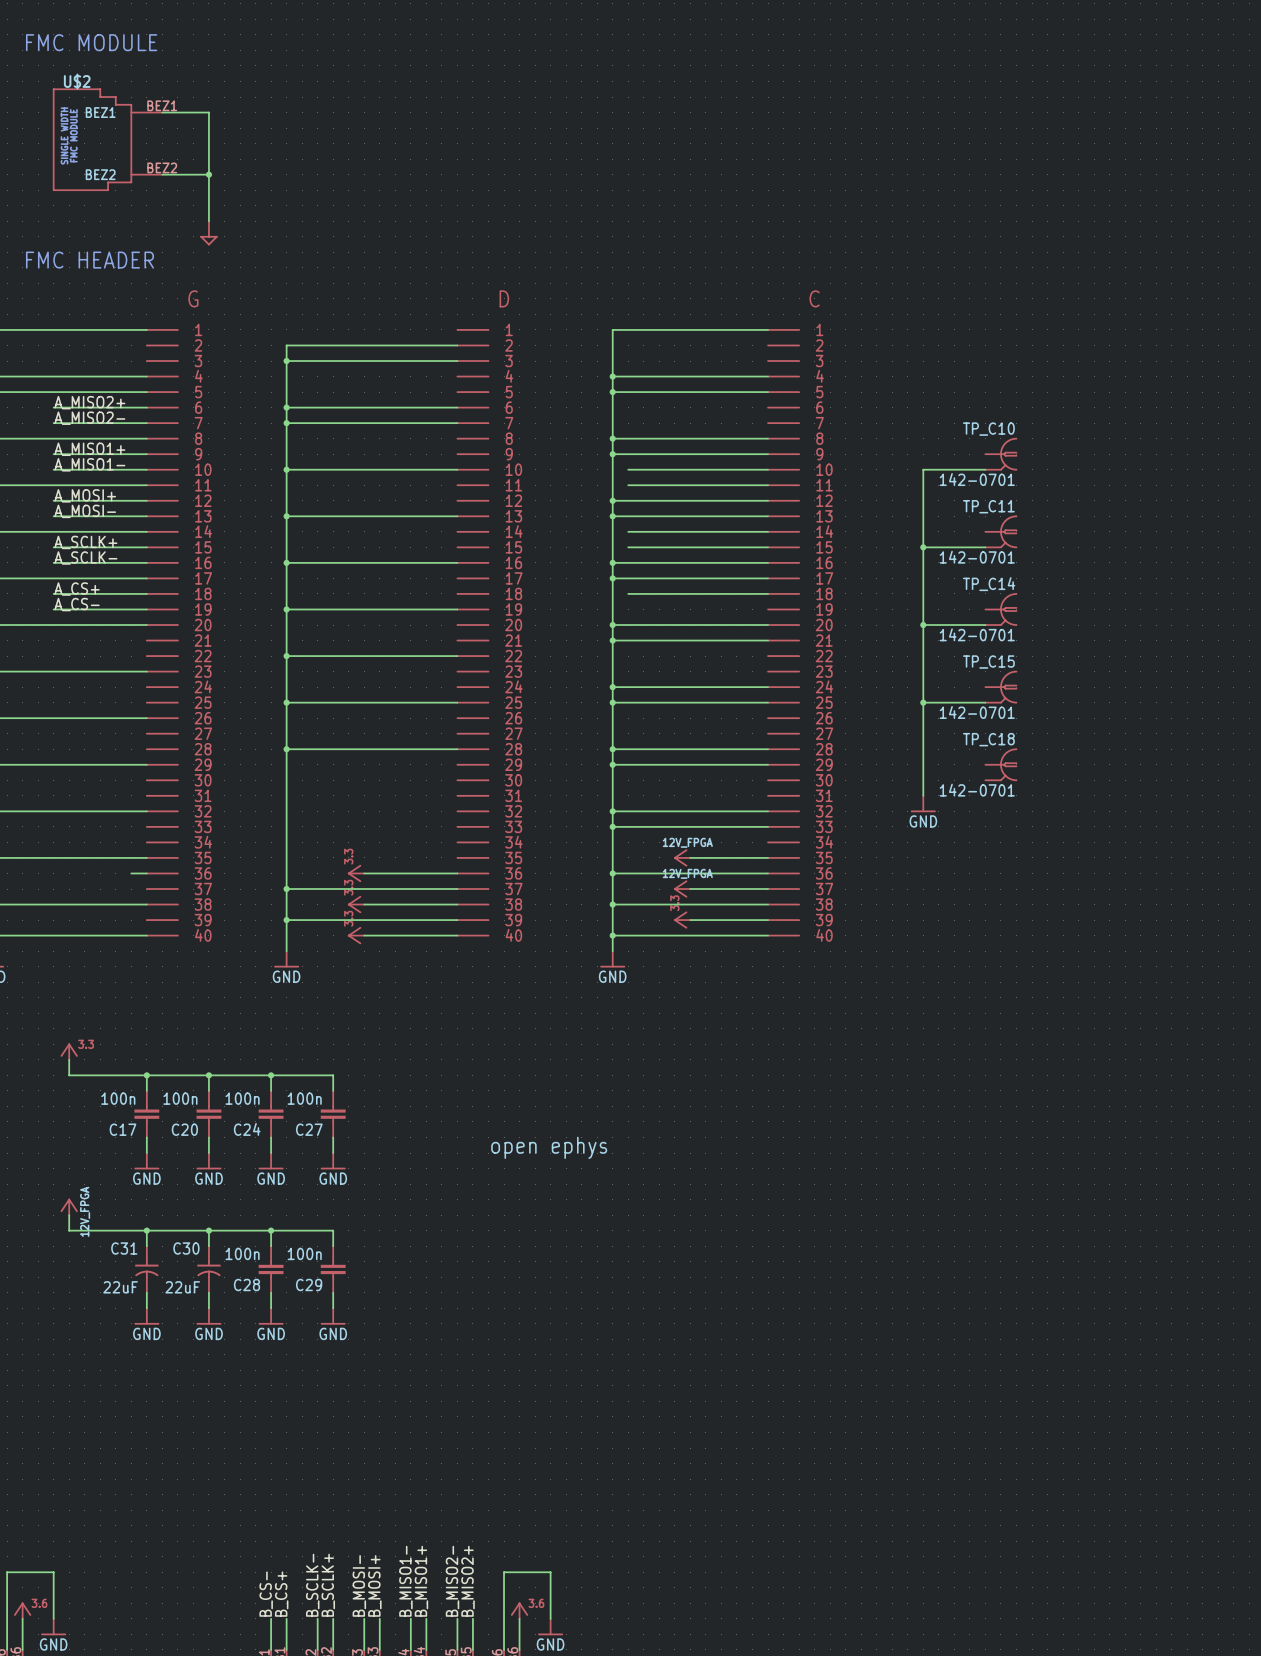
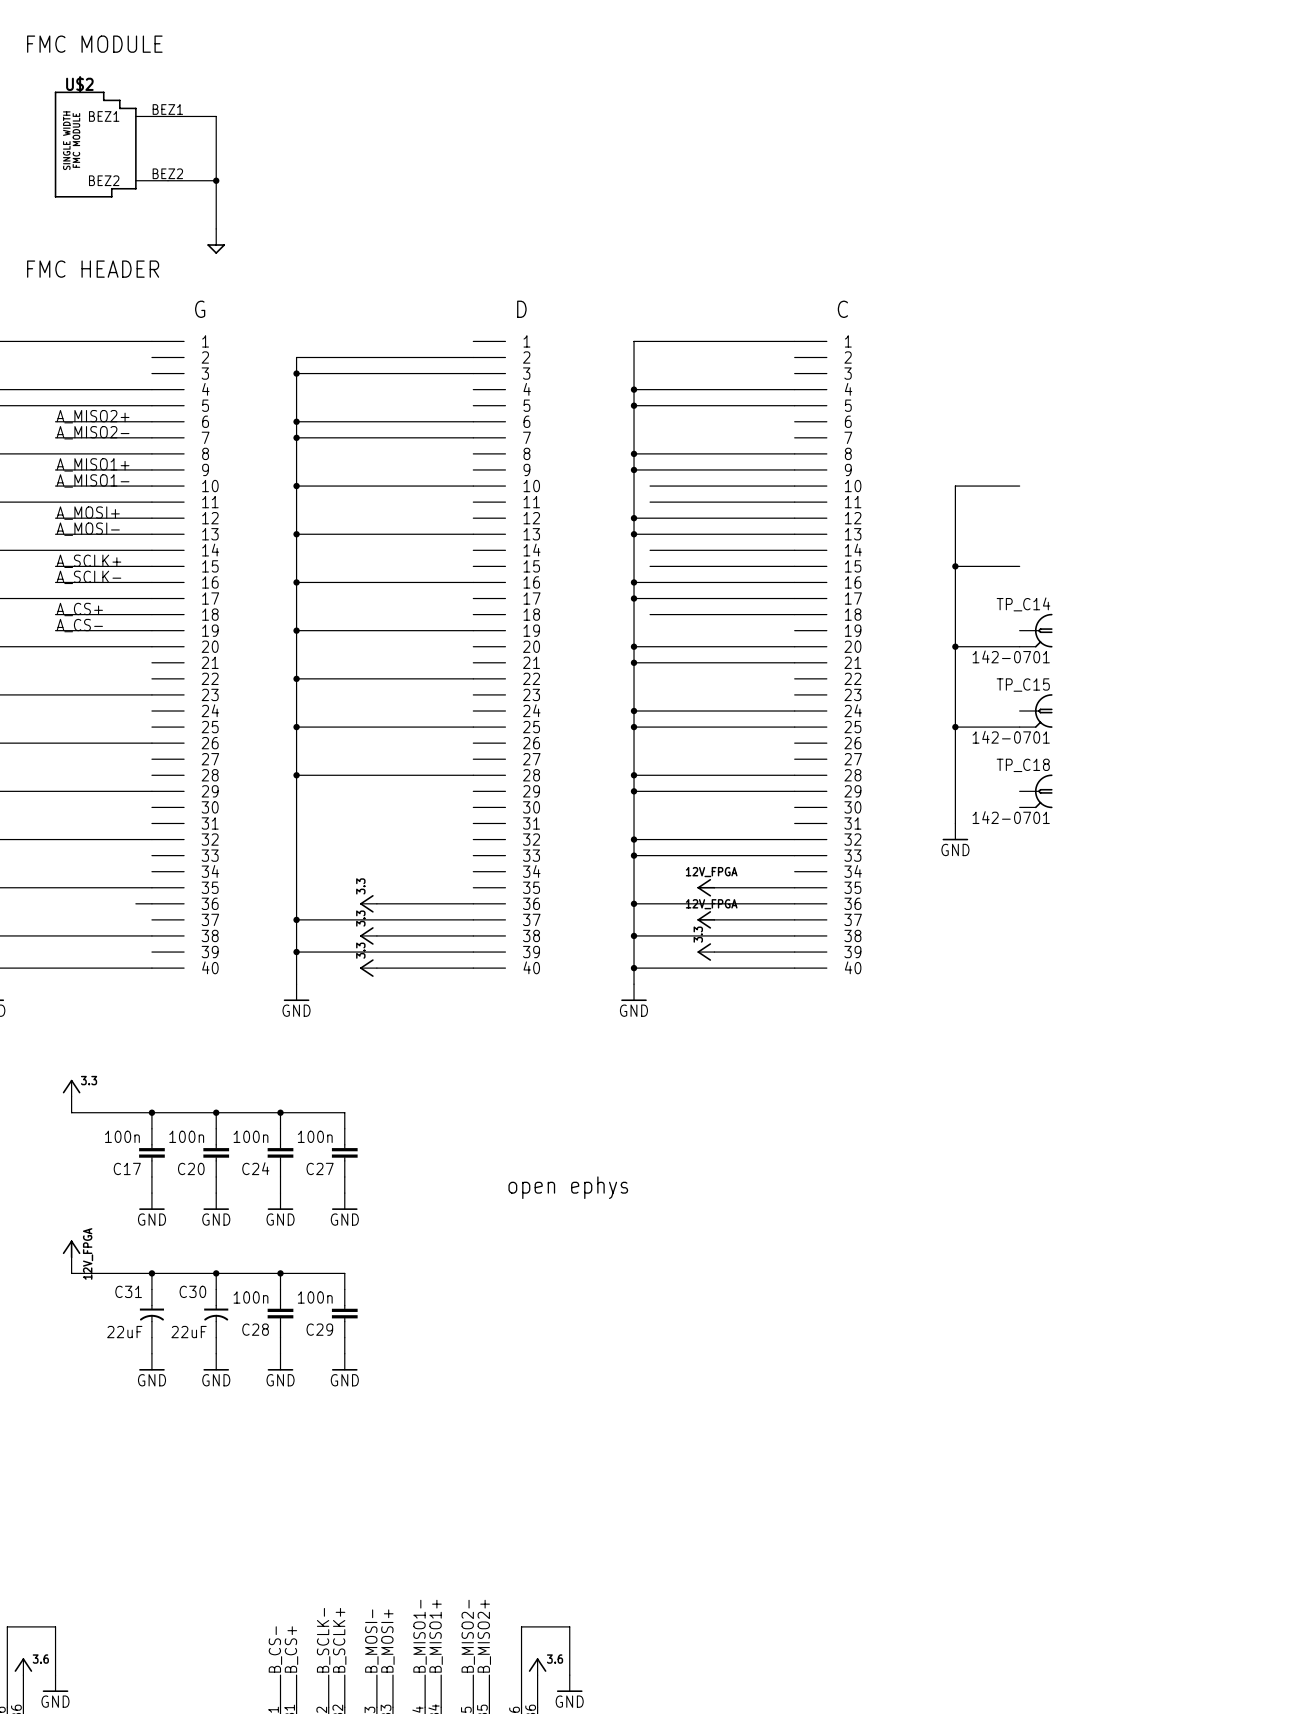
TP_C10: 142-0701 (1001, 454) -> none
TP_C11: 142-0701 (1001, 531) -> none

